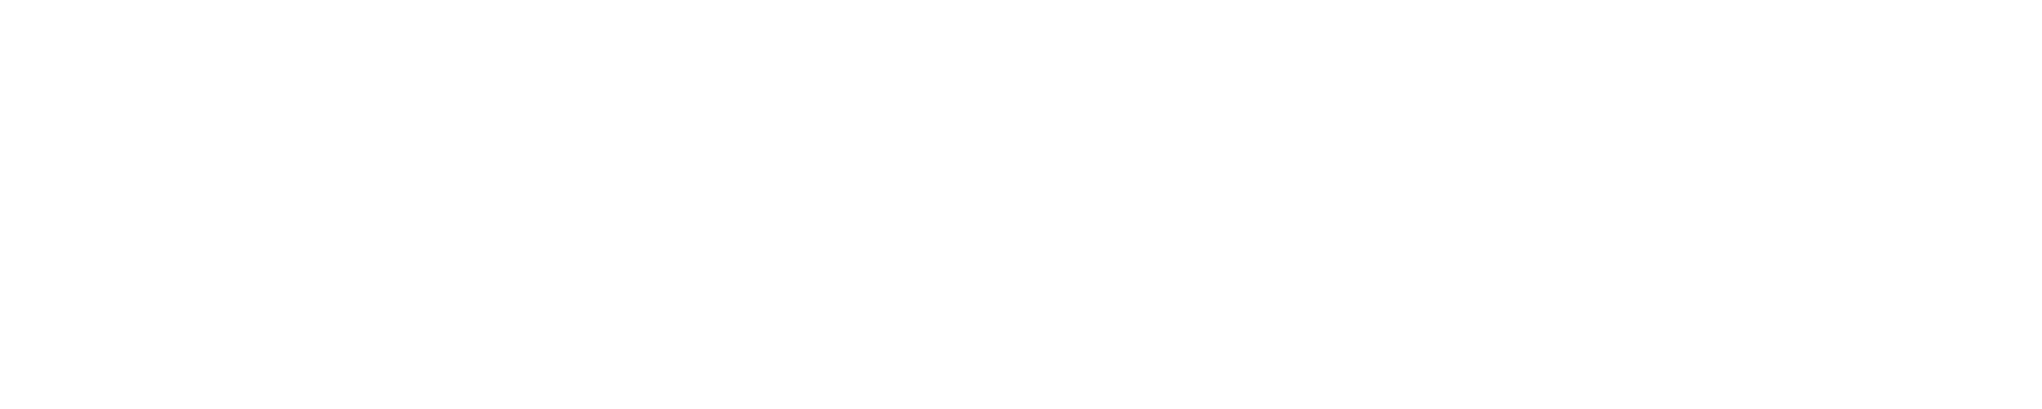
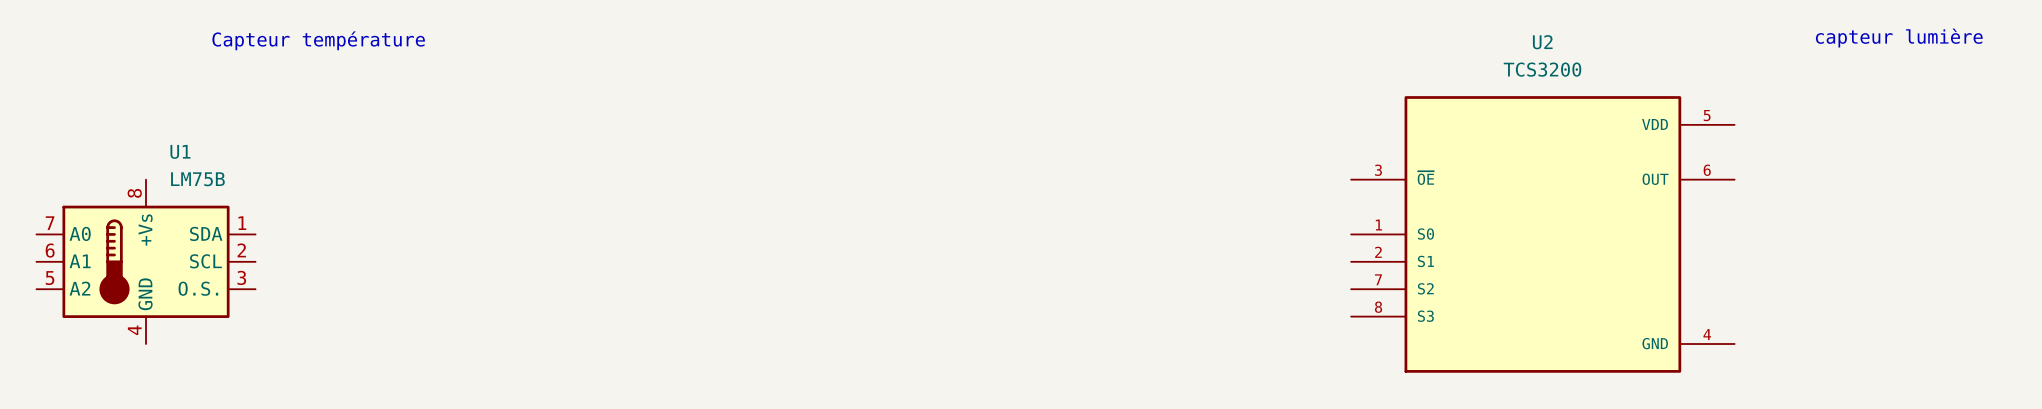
text: none -> capteur lumière (1899, 38)
text: none -> Capteur température (318, 40)
U2: none -> TCS3200 (1542, 234)
U1: none -> LM75B (146, 261)

